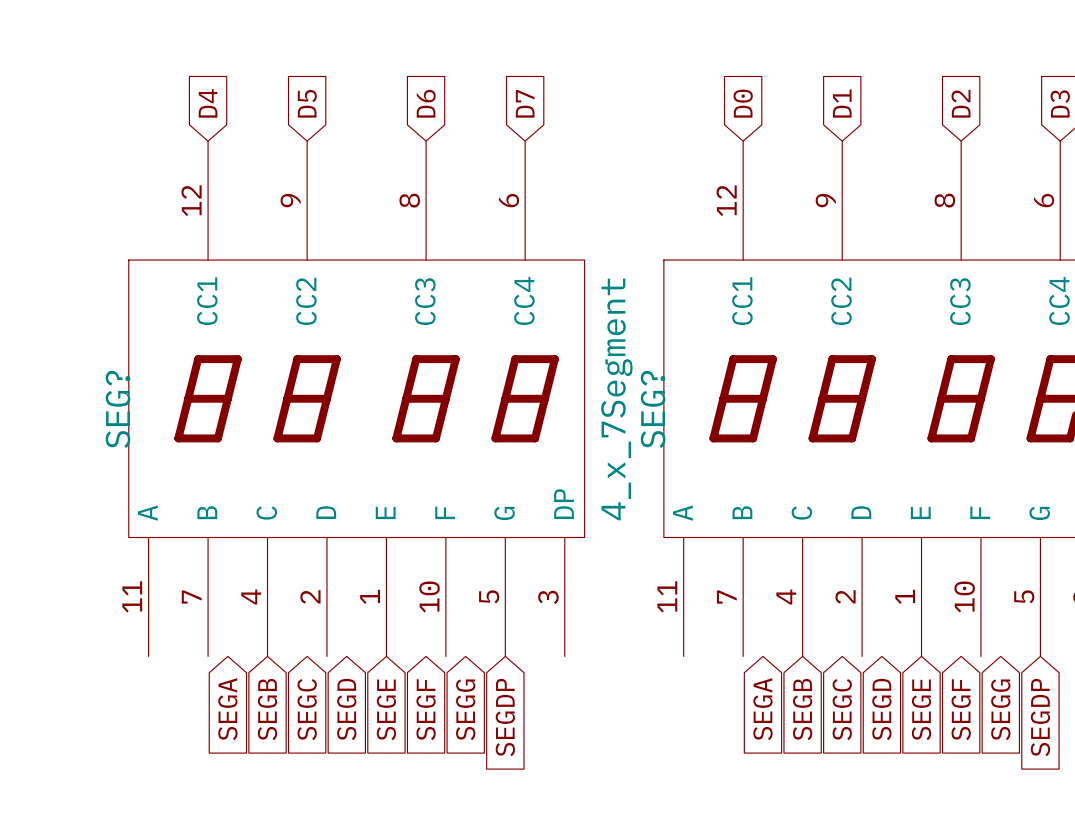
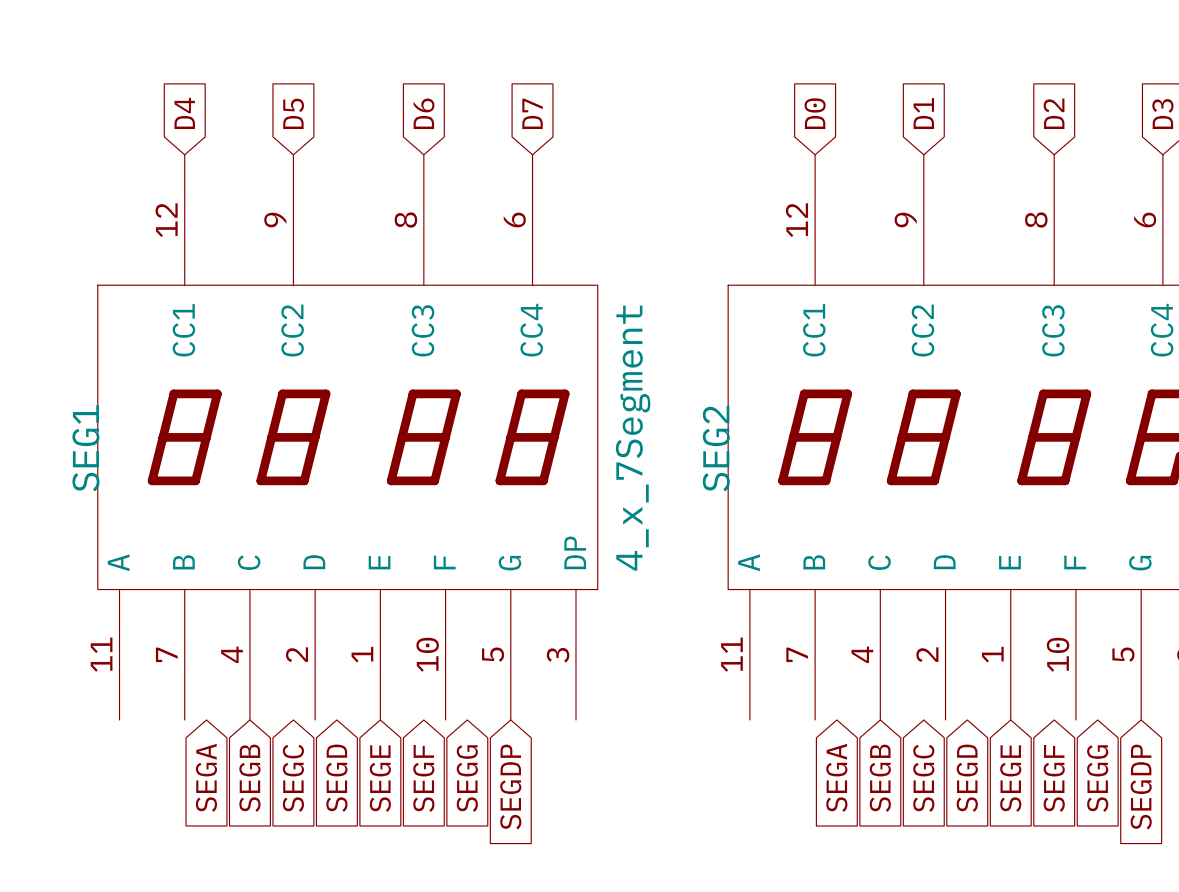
global label position: D4 (208, 103) -> D4 (184, 113)
global label position: D5 (307, 103) -> D5 (293, 113)
global label position: D6 (426, 103) -> D6 (424, 113)
global label position: D7 (525, 103) -> D7 (532, 113)
SEG1: none -> 4_x_7Segment (347, 437)
SEG?: 4_x_7Segment (356, 398) -> none
SEG? name: SEG? (653, 409) -> SEG2 (716, 448)
global label: none -> SEGA (206, 777)
global label: SEGA (227, 709) -> SEGB (249, 778)
global label: SEGB (267, 709) -> SEGC (293, 778)
global label: SEGC (307, 709) -> SEGD (336, 778)
global label: SEGD (346, 709) -> SEGE (380, 778)
global label: SEGE (386, 709) -> SEGF (423, 778)
global label: SEGF (426, 709) -> SEGG (467, 778)
global label: SEGG (465, 709) -> SEGDP (510, 787)
global label: SEGDP (505, 717) -> none

